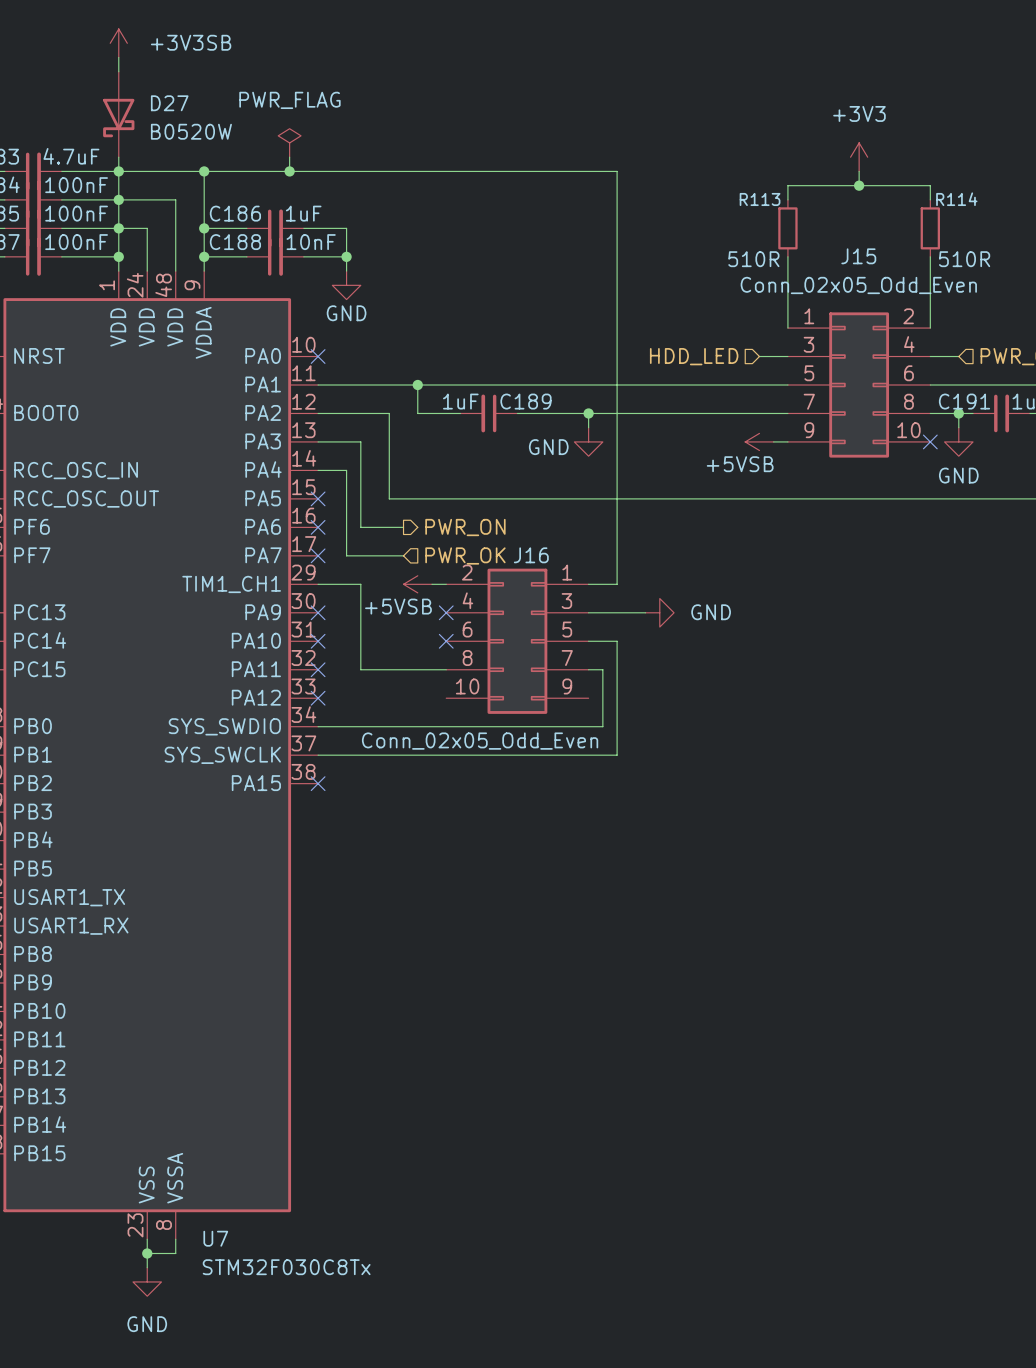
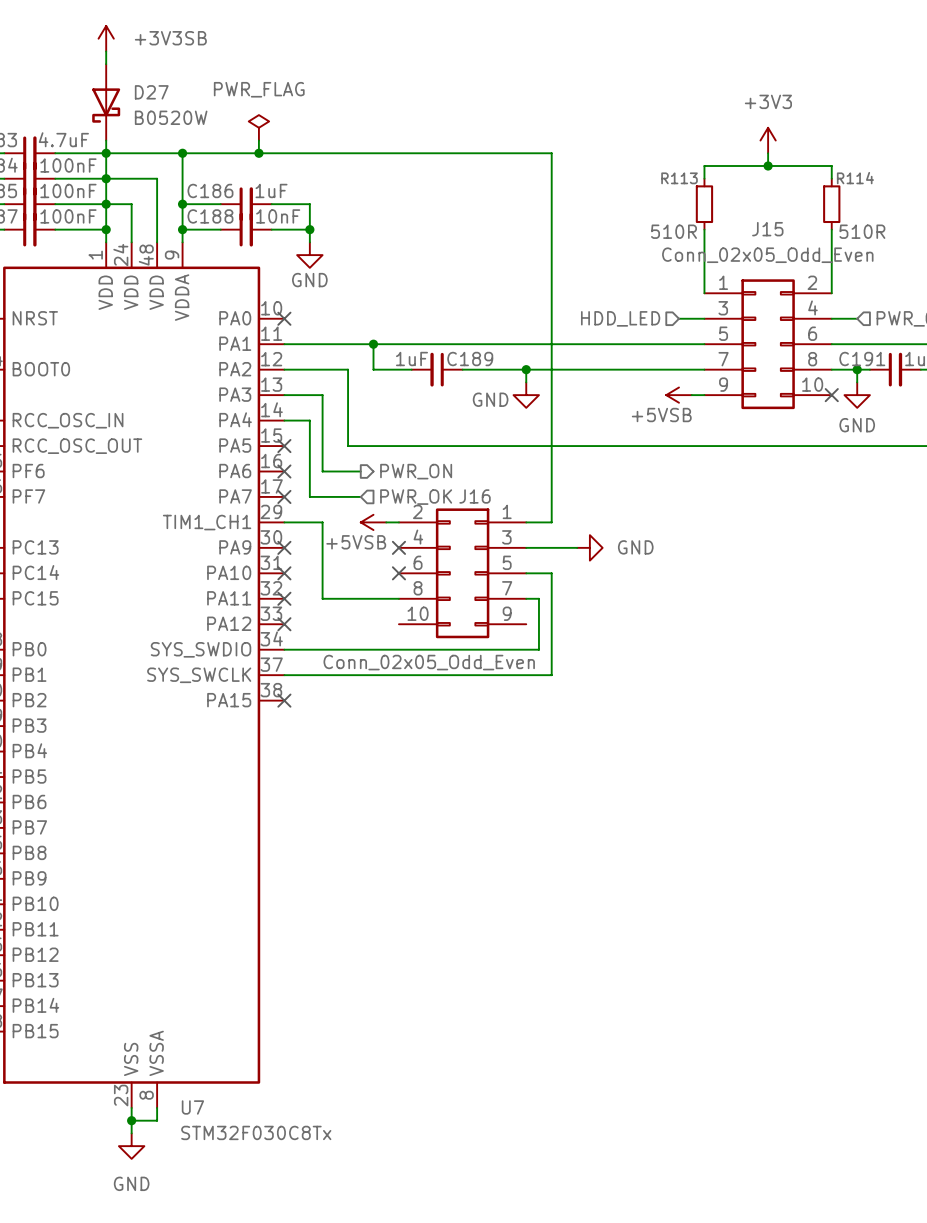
U7 pin name: USART1_TX (69, 897) -> PB6 (29, 801)
U7 pin name: USART1_RX (71, 926) -> PB7 (29, 827)

